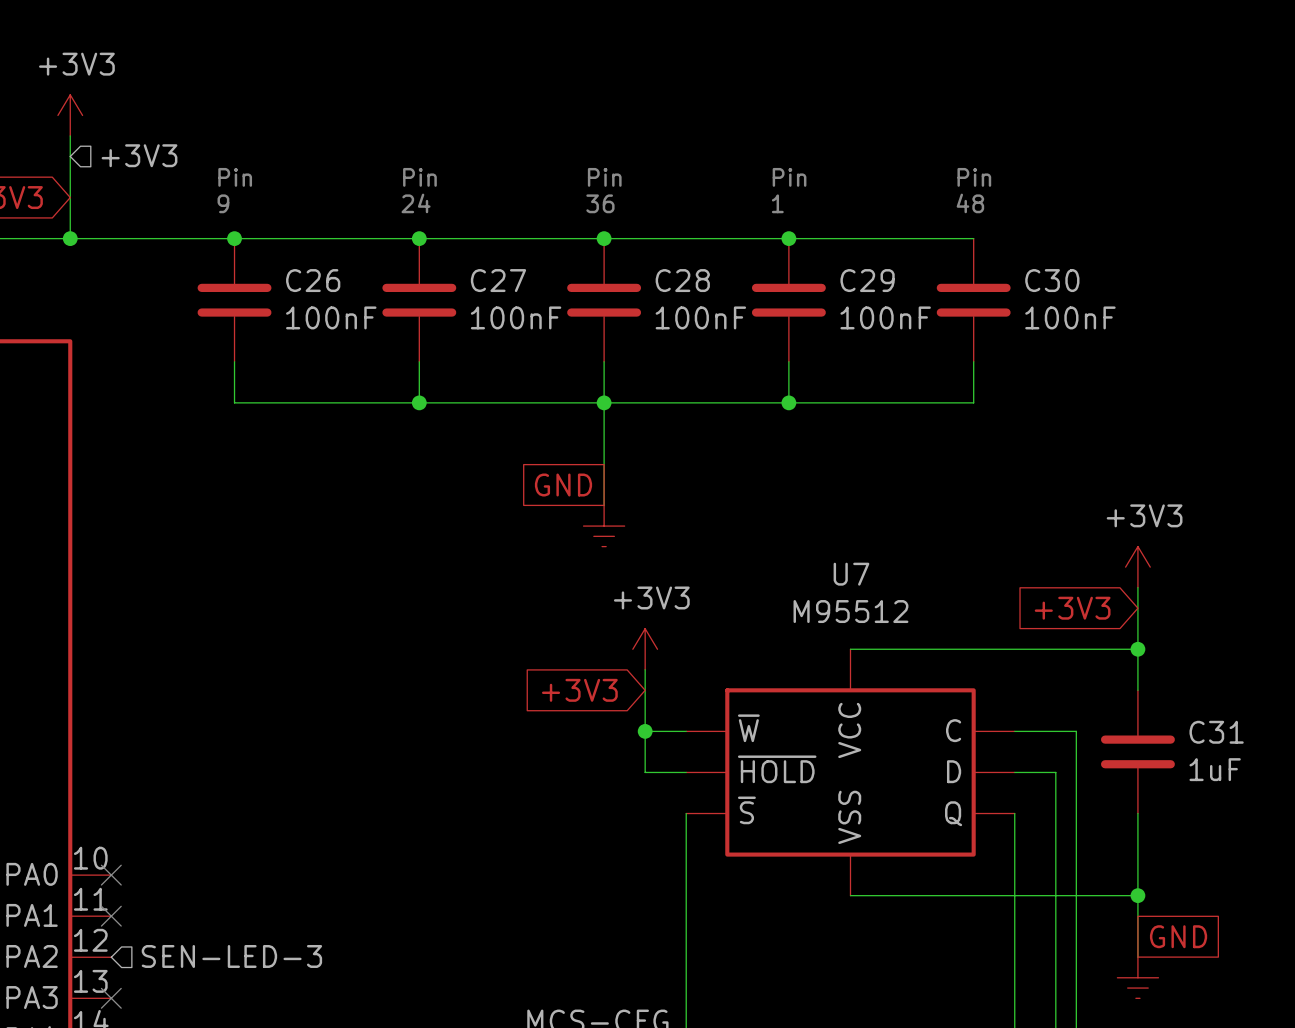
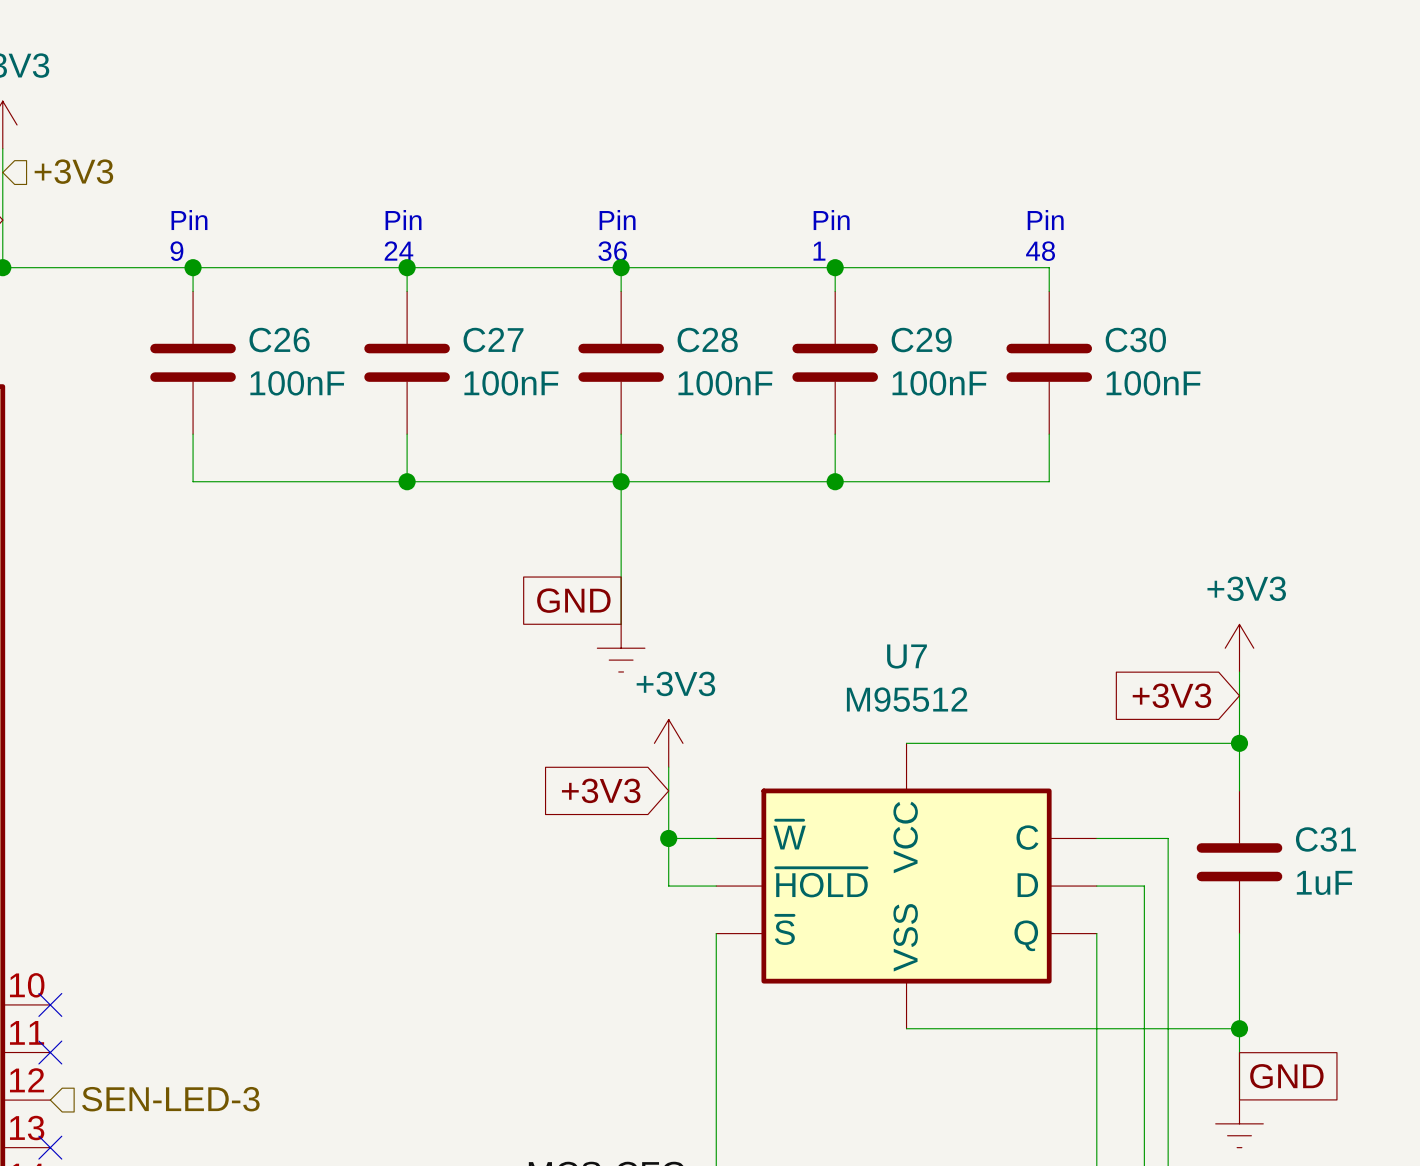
text position: Pin (235, 177) -> Pin (189, 220)
text position: Pin (419, 177) -> Pin (403, 220)
text position: Pin (604, 177) -> Pin (617, 220)
text position: Pin (789, 177) -> Pin (831, 220)
text position: Pin (974, 177) -> Pin (1045, 220)
text position: 9 (223, 203) -> 9 (176, 251)
text position: 24 (416, 203) -> 24 (398, 251)
text position: 36 (600, 203) -> 36 (612, 251)
text position: 1 (777, 203) -> 1 (819, 251)
text position: 48 (970, 203) -> 48 (1040, 251)
C26 position: (234, 300) -> (193, 362)
C27 position: (419, 300) -> (407, 362)
C28 position: (604, 300) -> (621, 362)
C29 position: (788, 300) -> (835, 362)
C30 position: (973, 300) -> (1049, 362)
wire: (234, 402) (973, 402) -> (193, 457) (193, 481) (1049, 481) (1049, 457)
wire: none -> (407, 457) (407, 481)
junction position: (419, 402) -> (407, 481)
junction position: (604, 402) -> (621, 481)
wire: none -> (835, 457) (835, 481)
junction position: (788, 402) -> (835, 481)
global label position: GND (563, 485) -> GND (573, 600)
power symbol position: (604, 526) -> (621, 648)

